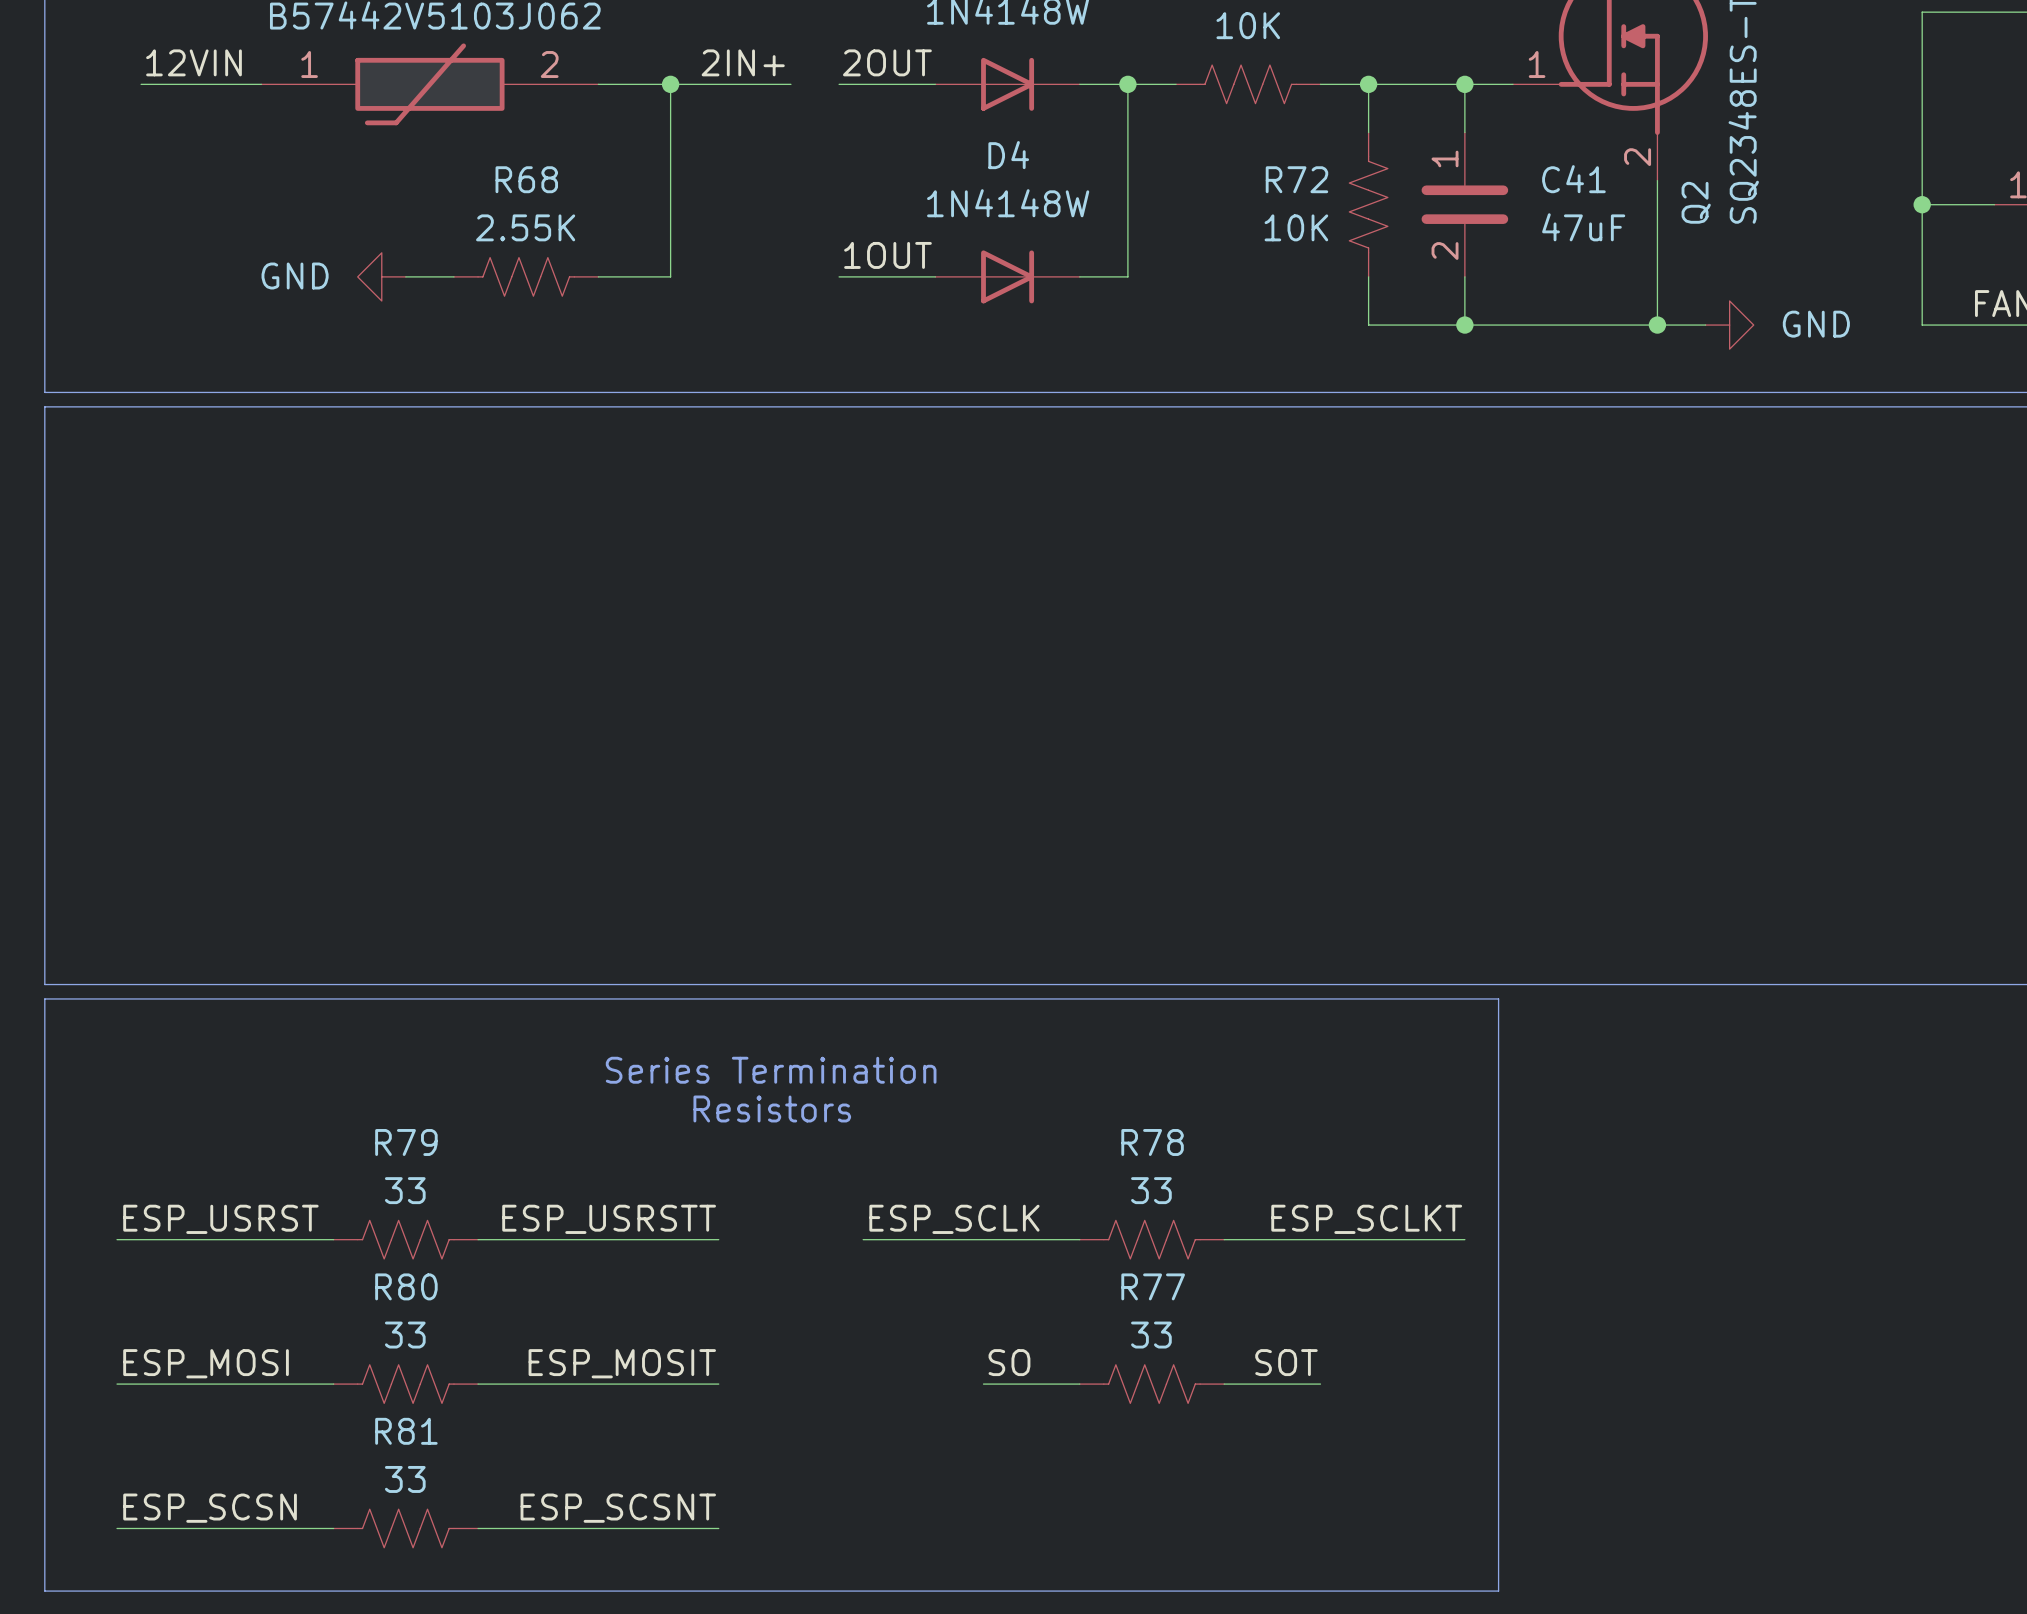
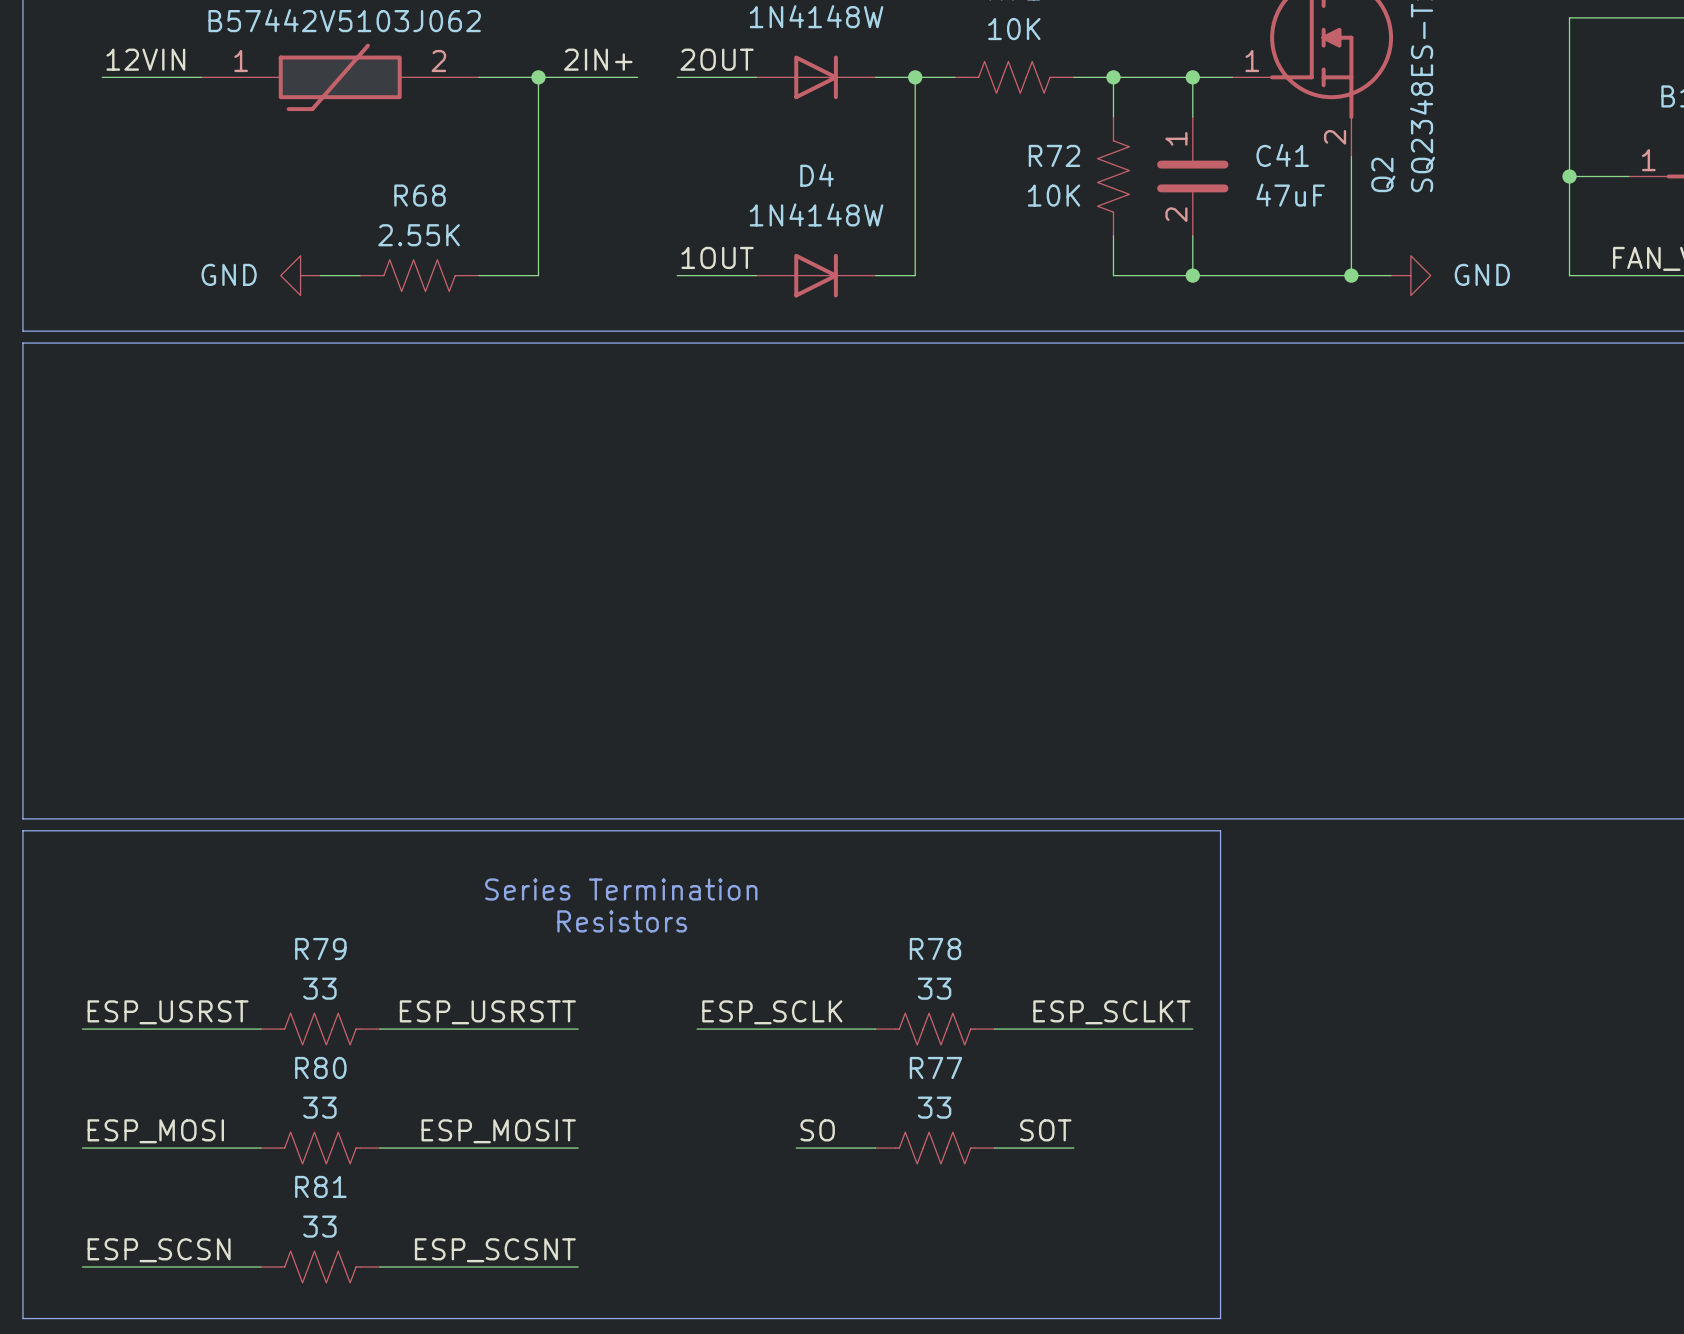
label position: 1OUT (887, 255) -> 1OUT (717, 257)
power symbol position: GND (381, 276) -> GND (300, 275)
wire: (405, 276) (453, 276) -> (320, 275) (360, 275)
R68 position: (526, 276) -> (419, 275)
wire: (598, 276) (670, 276) -> (479, 275) (538, 275) (538, 235)
wire: (839, 276) (935, 276) -> (677, 275) (756, 275)
D4 position: (1007, 276) -> (816, 275)
wire: (1079, 276) (1127, 276) -> (875, 275) (915, 275) (915, 235)

